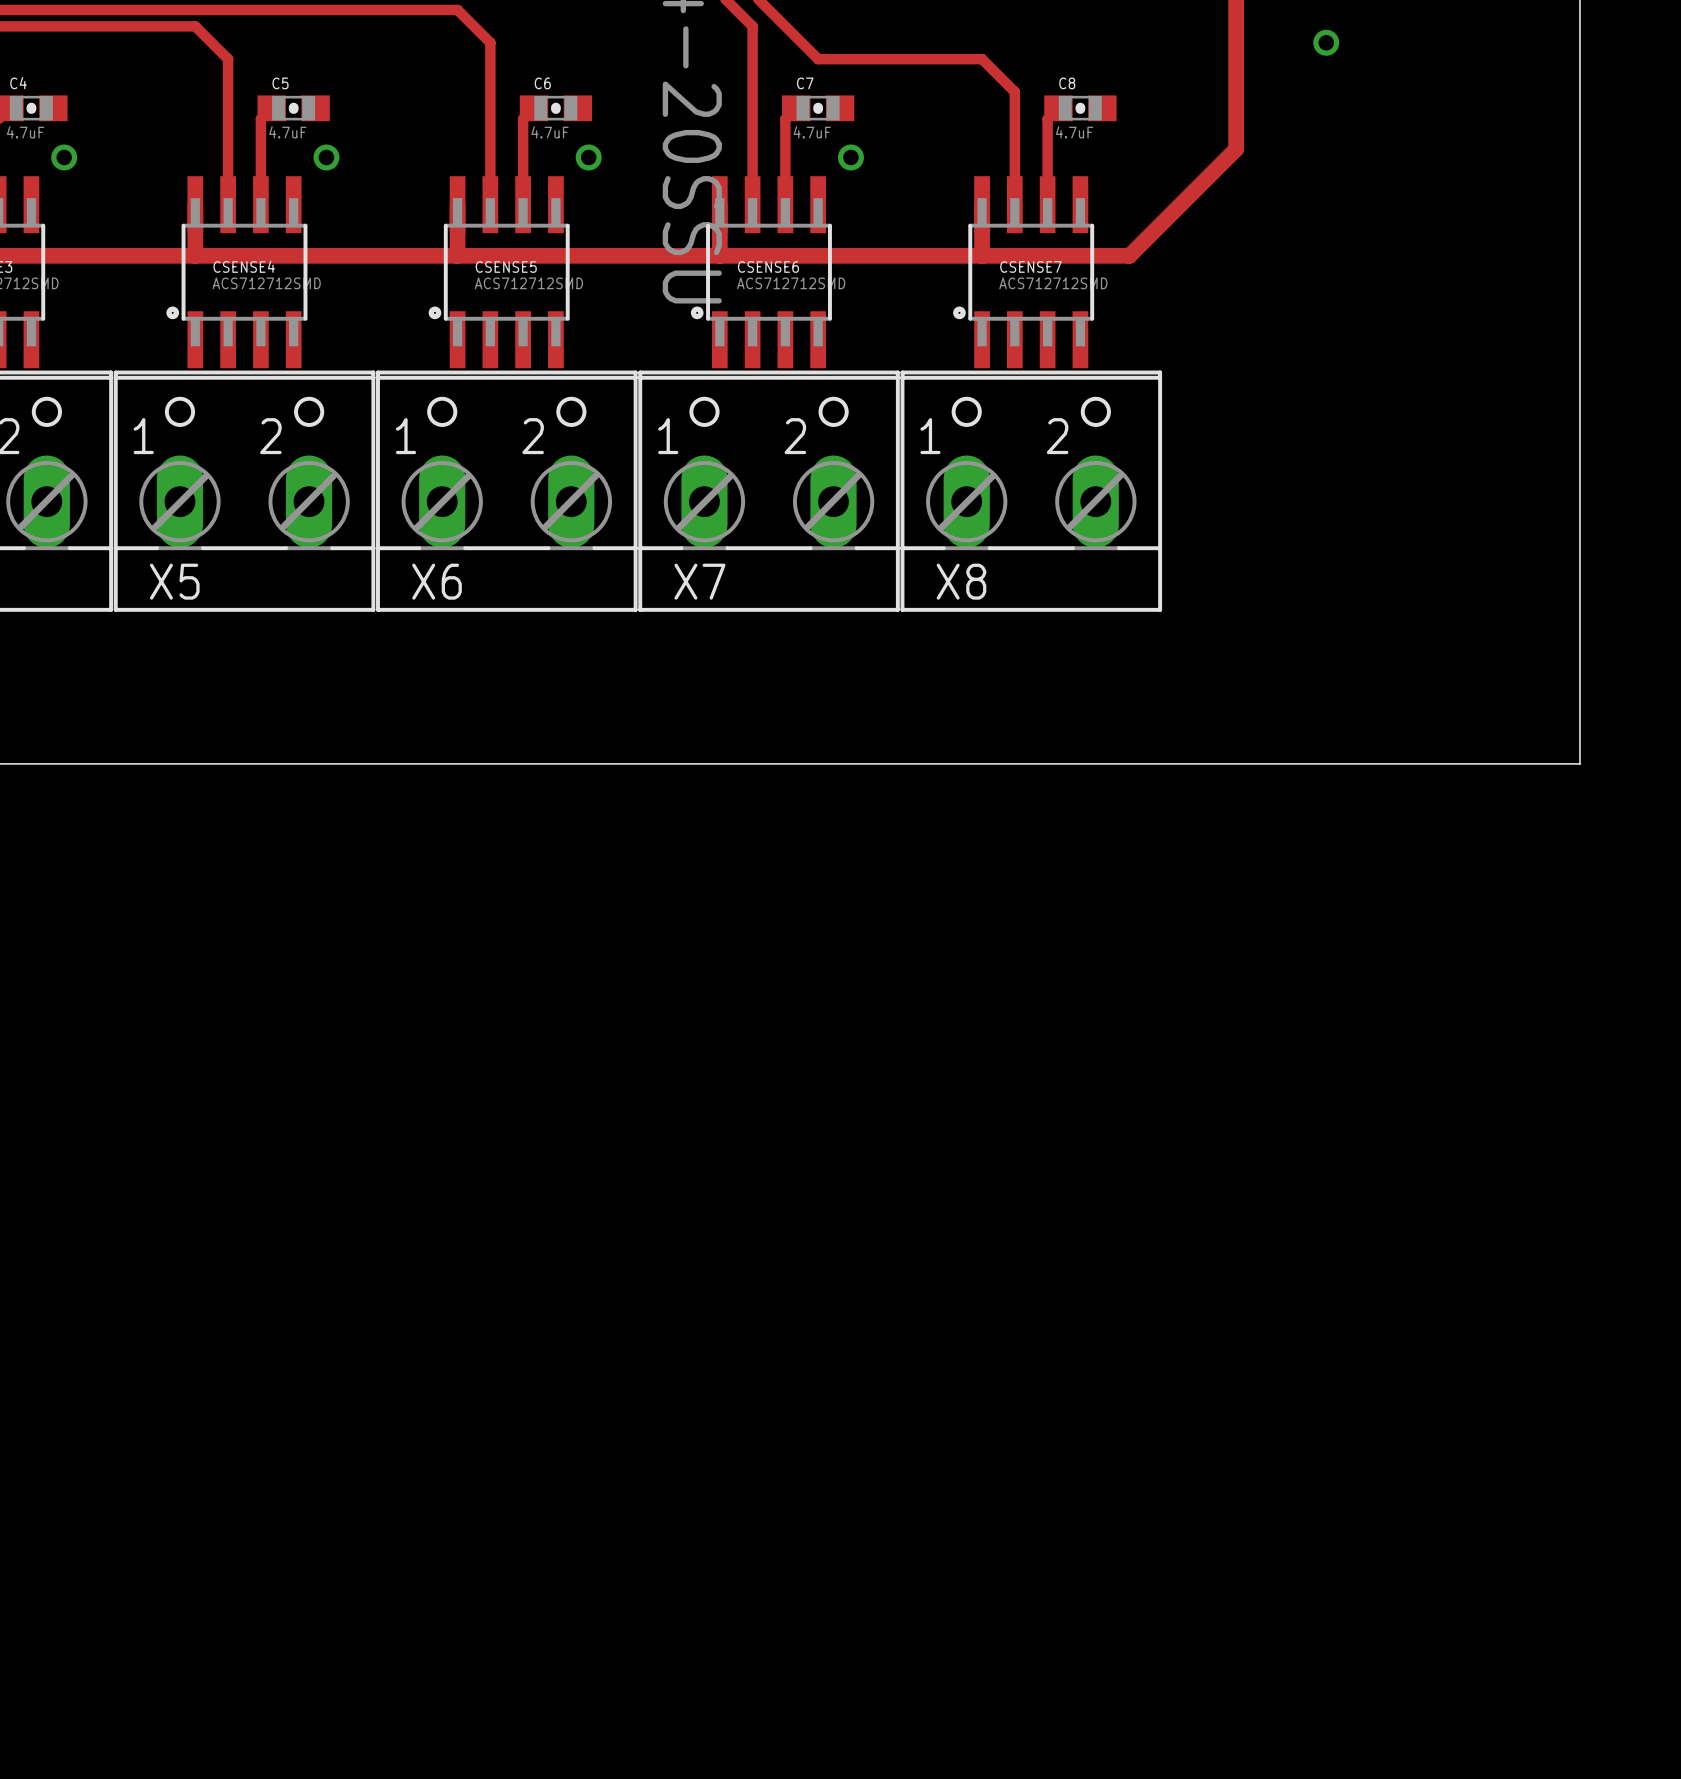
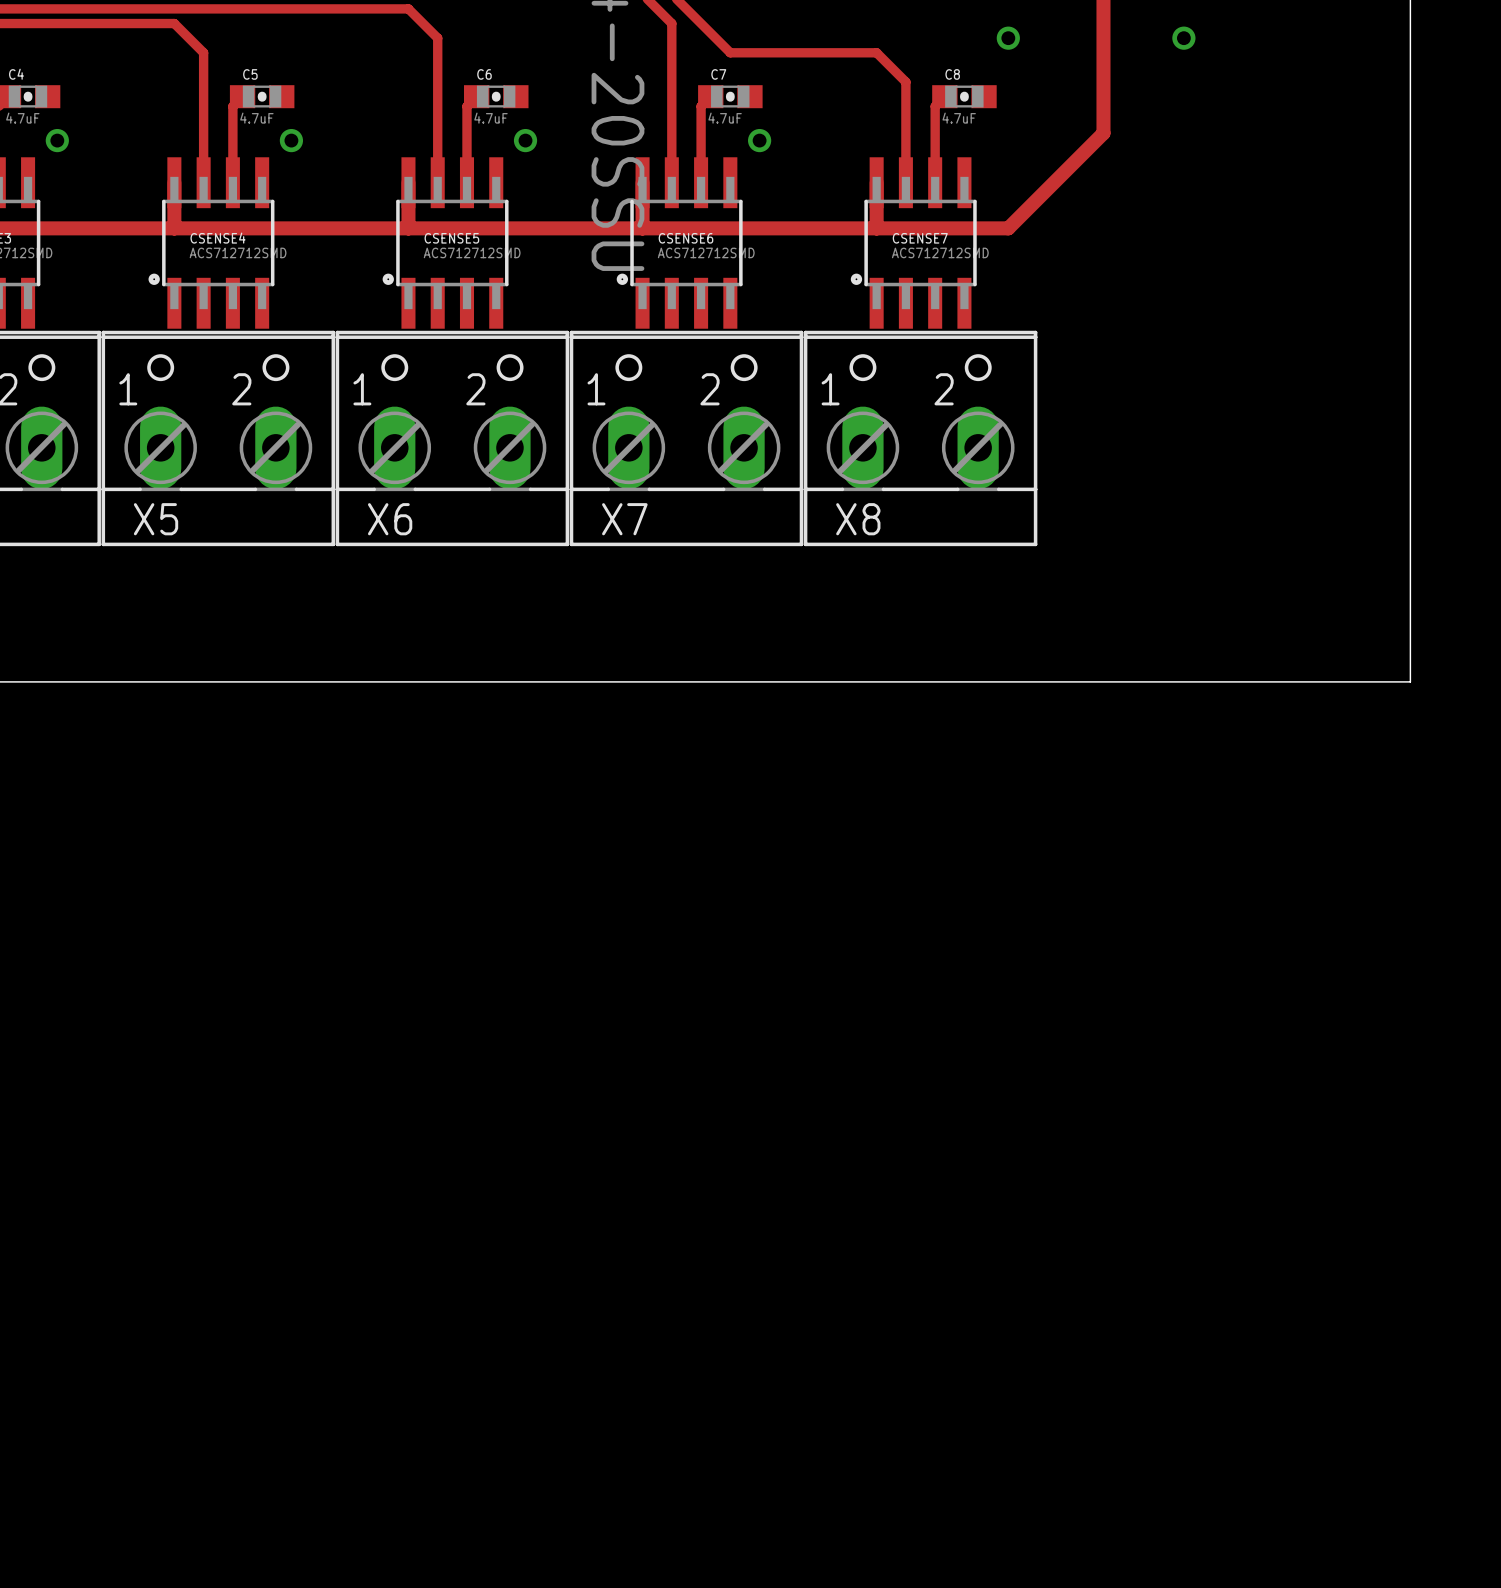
via: none -> (1008, 38)

